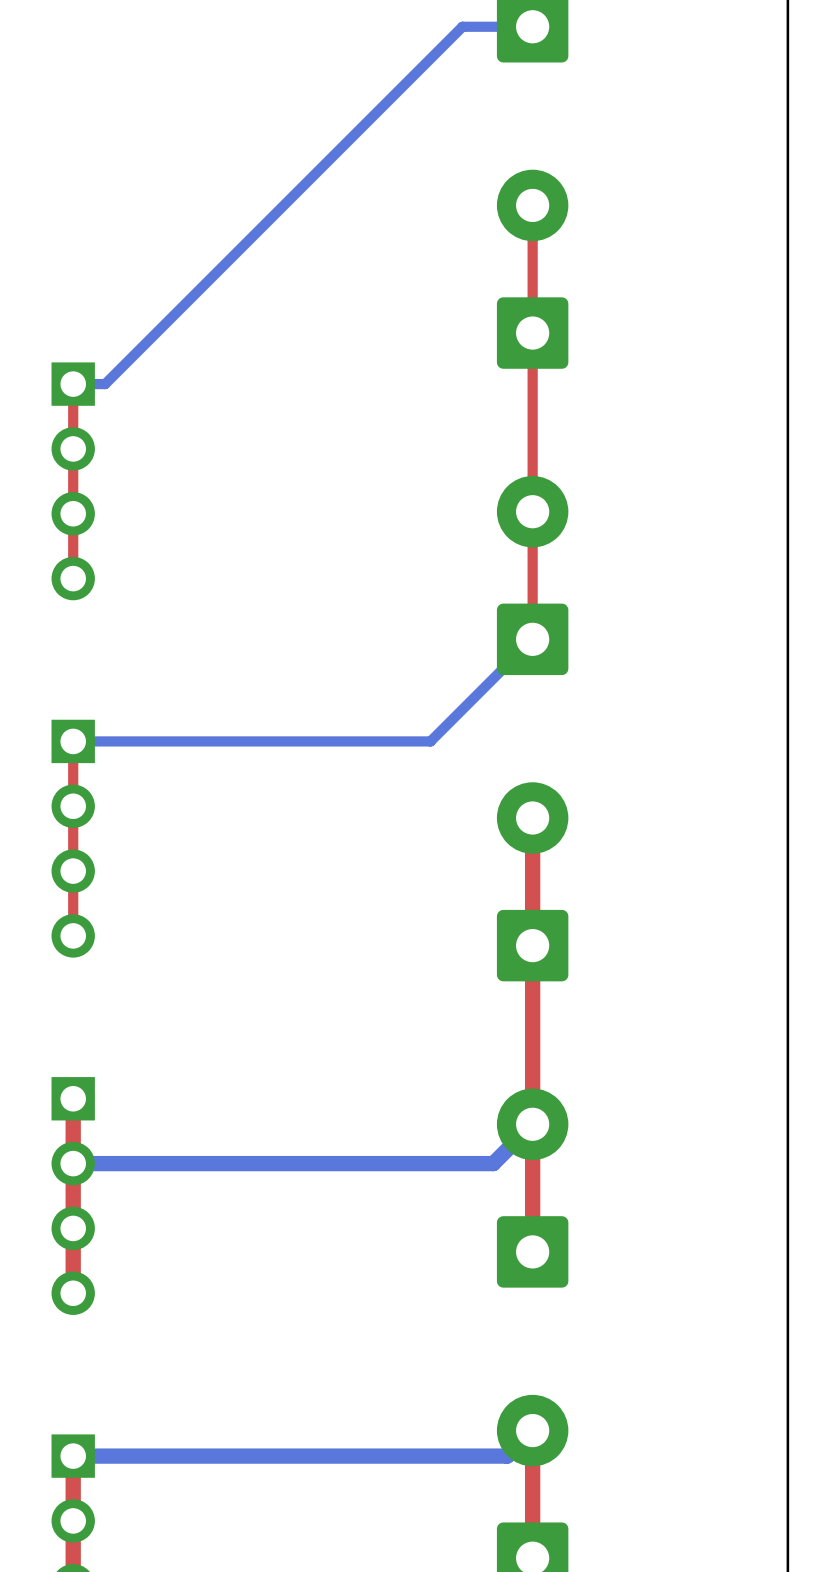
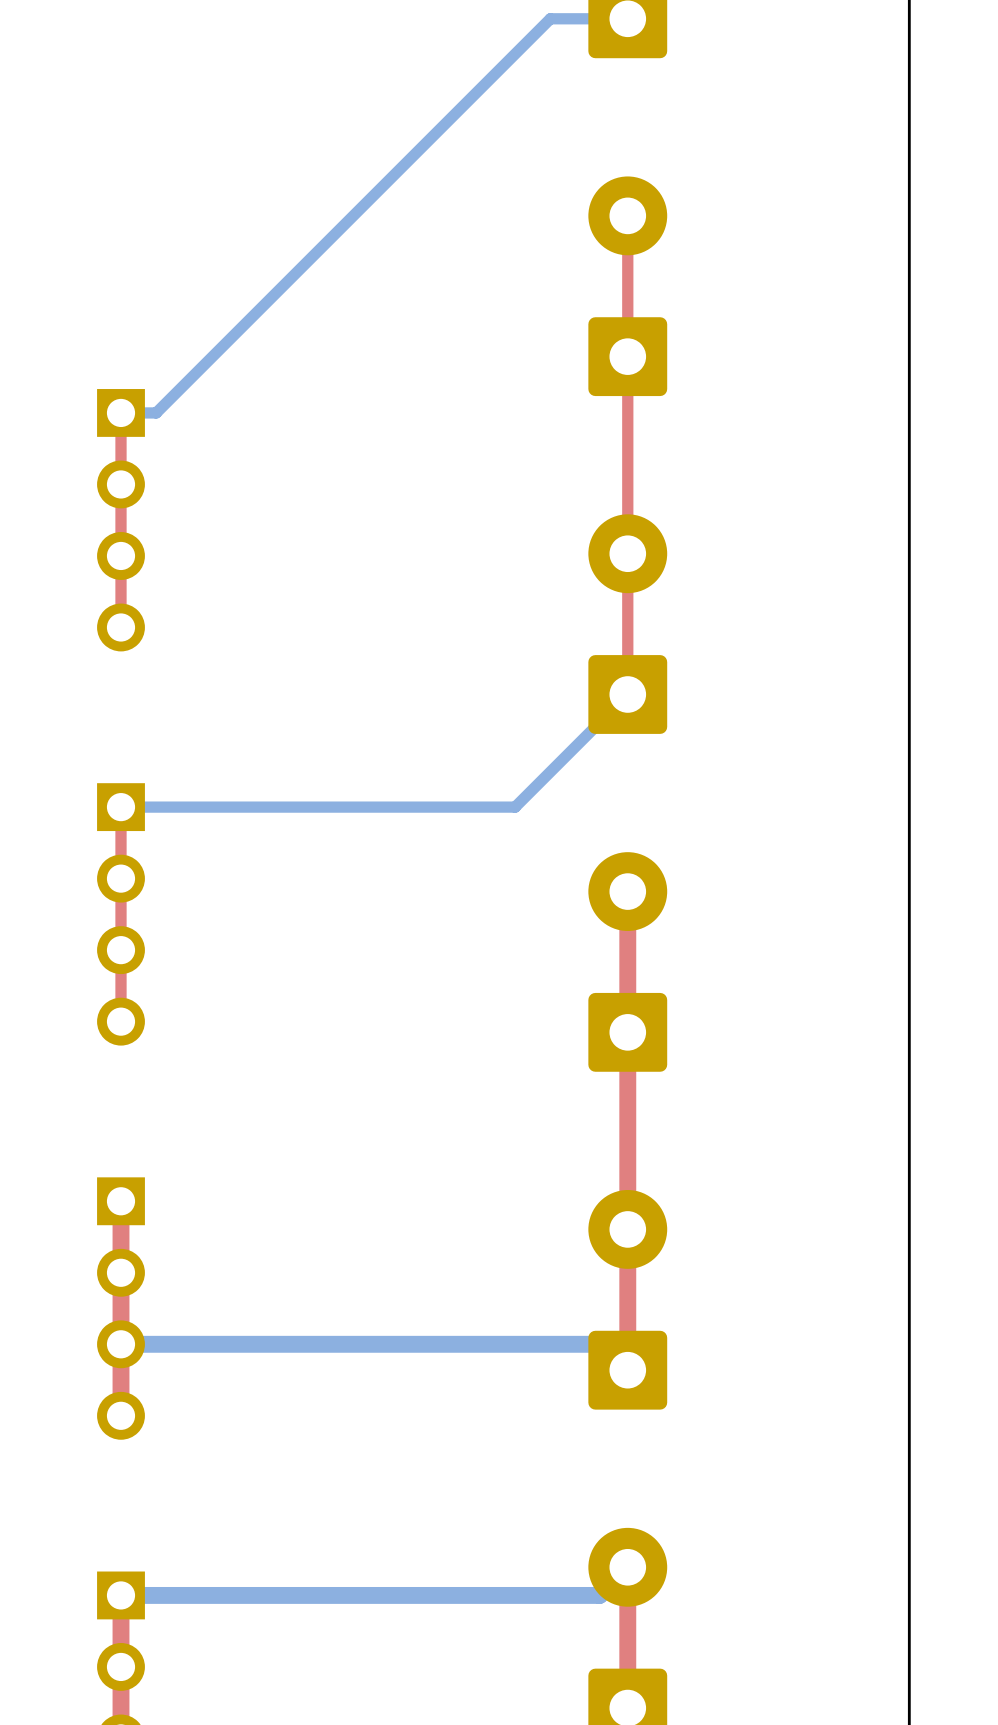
bottom track: (532, 1124) (493, 1163) (73, 1163) -> none
bottom track: none -> (121, 1344) (601, 1344) (627, 1370)

